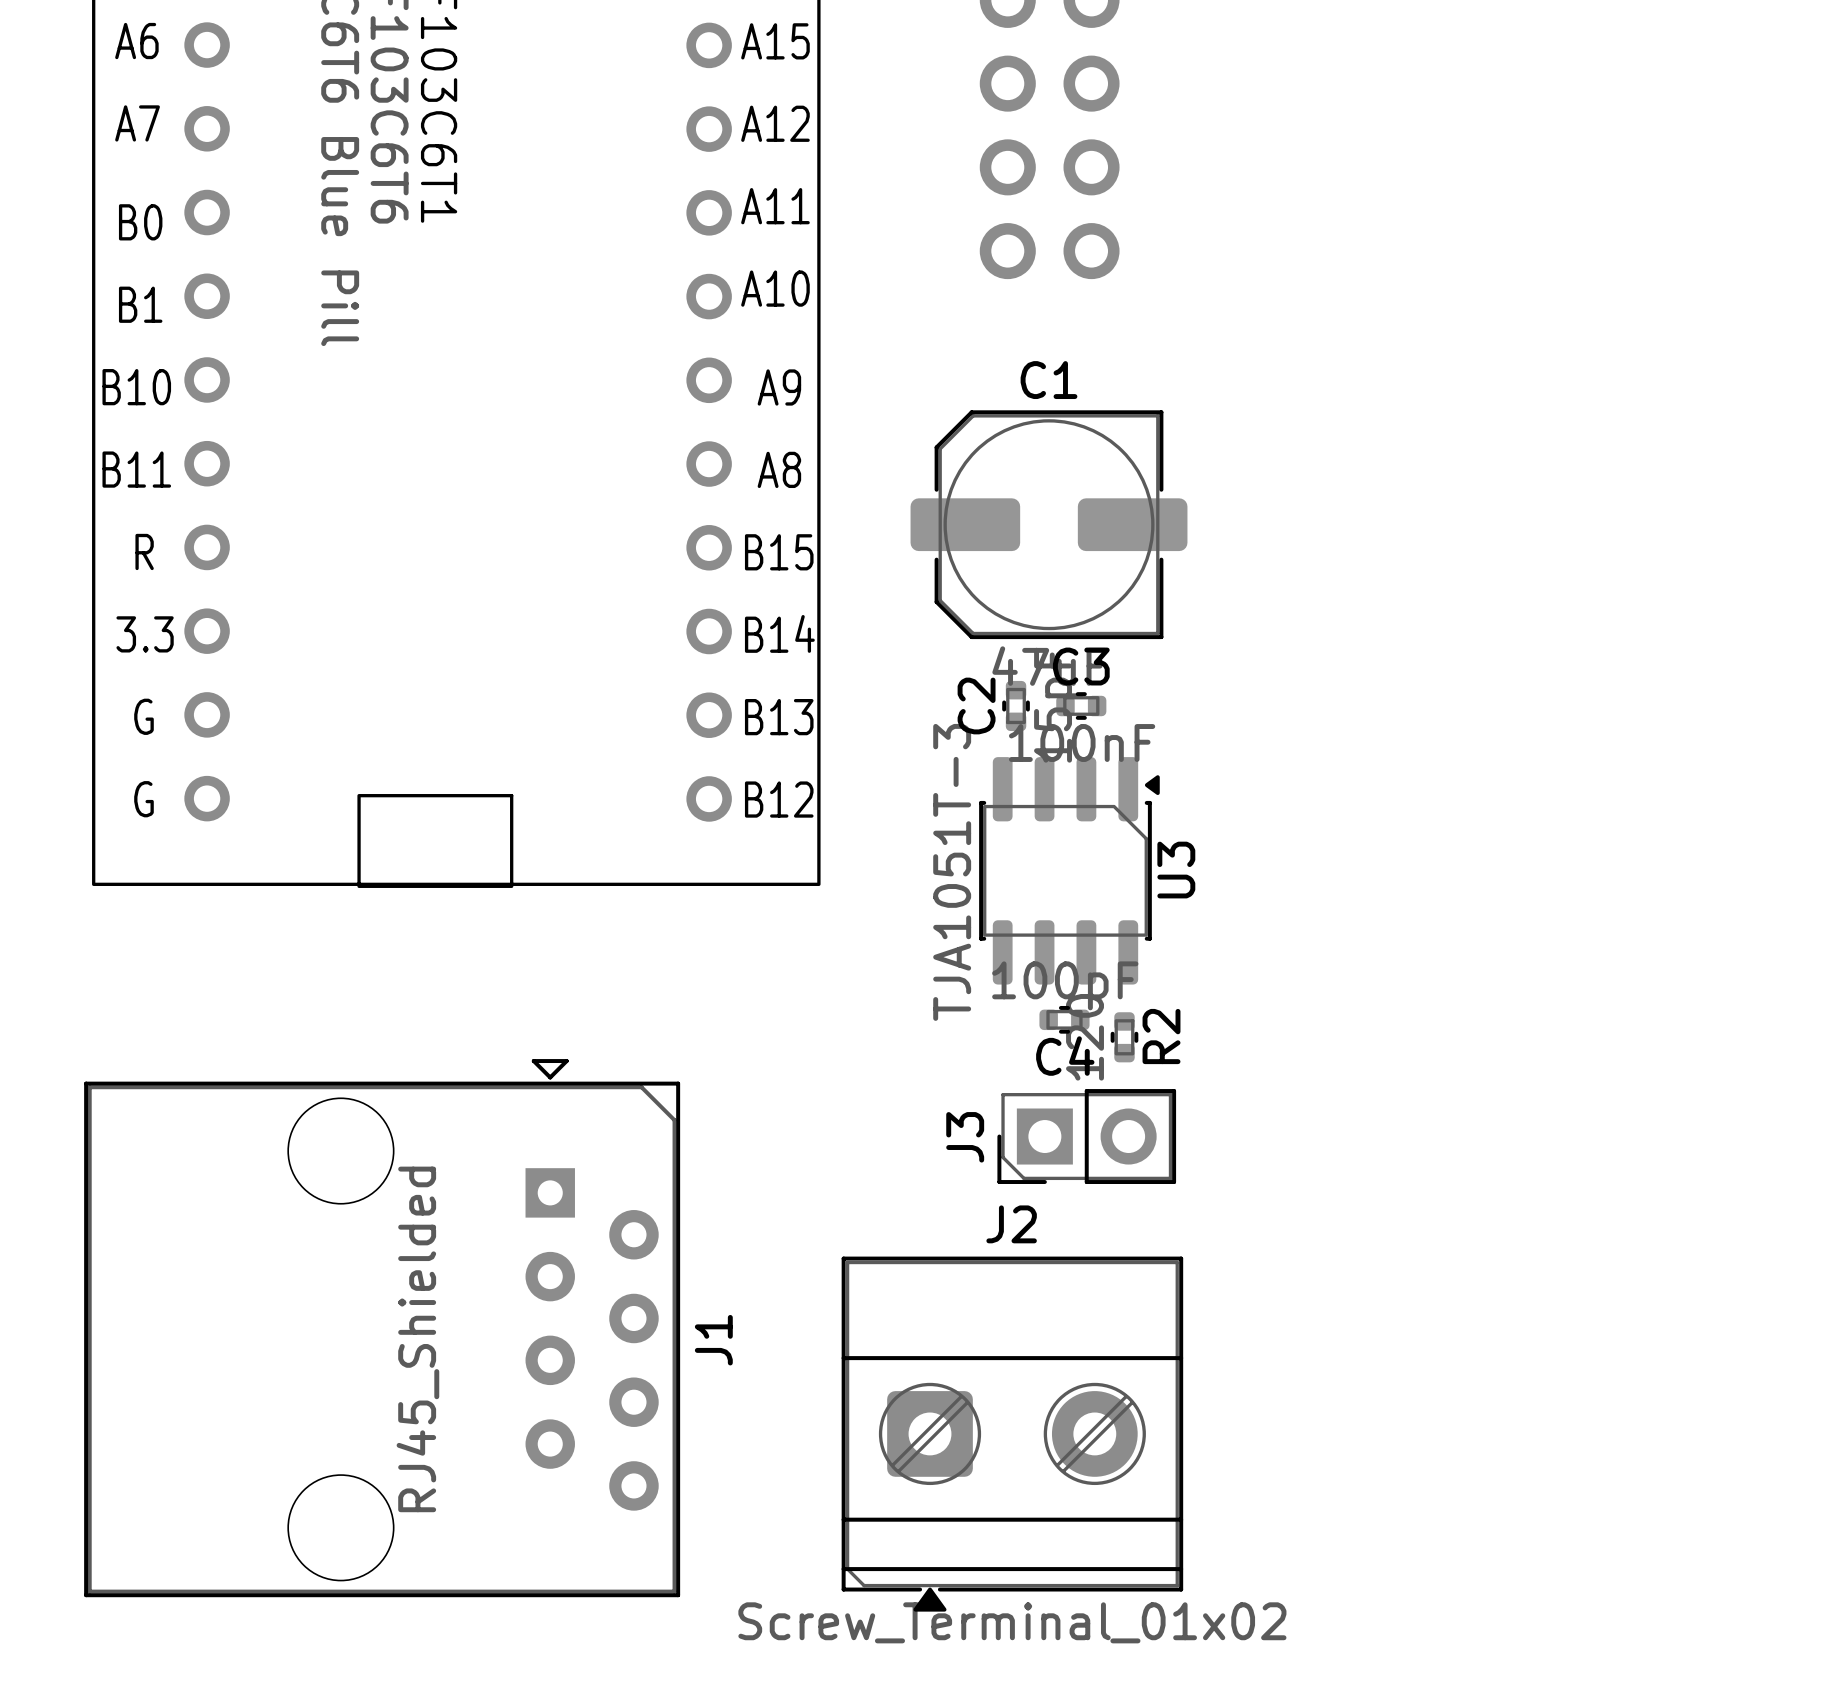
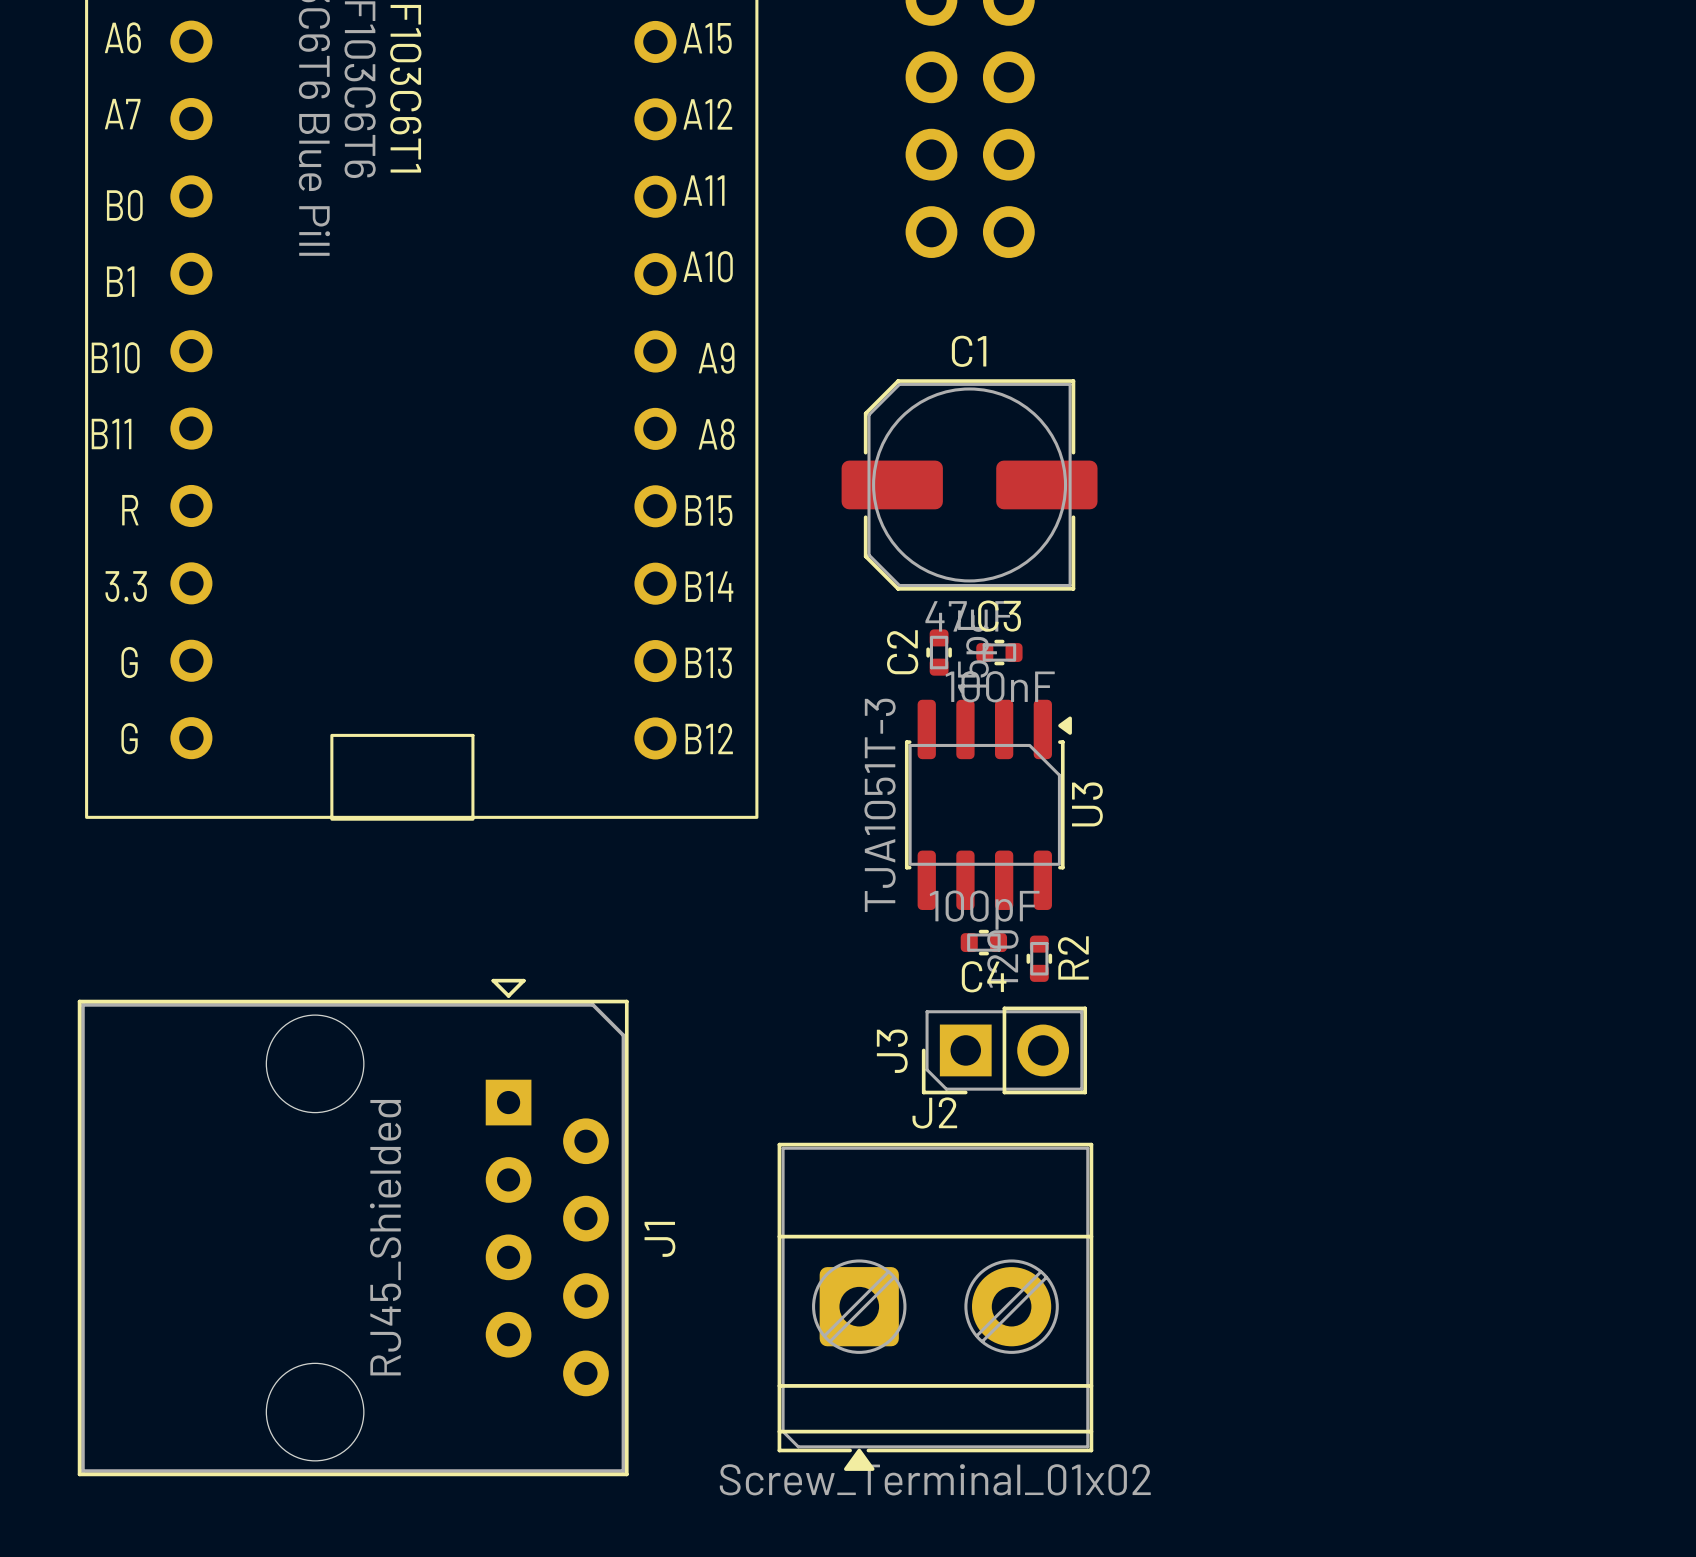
J2 position: (1012, 1434) -> (935, 1306)

